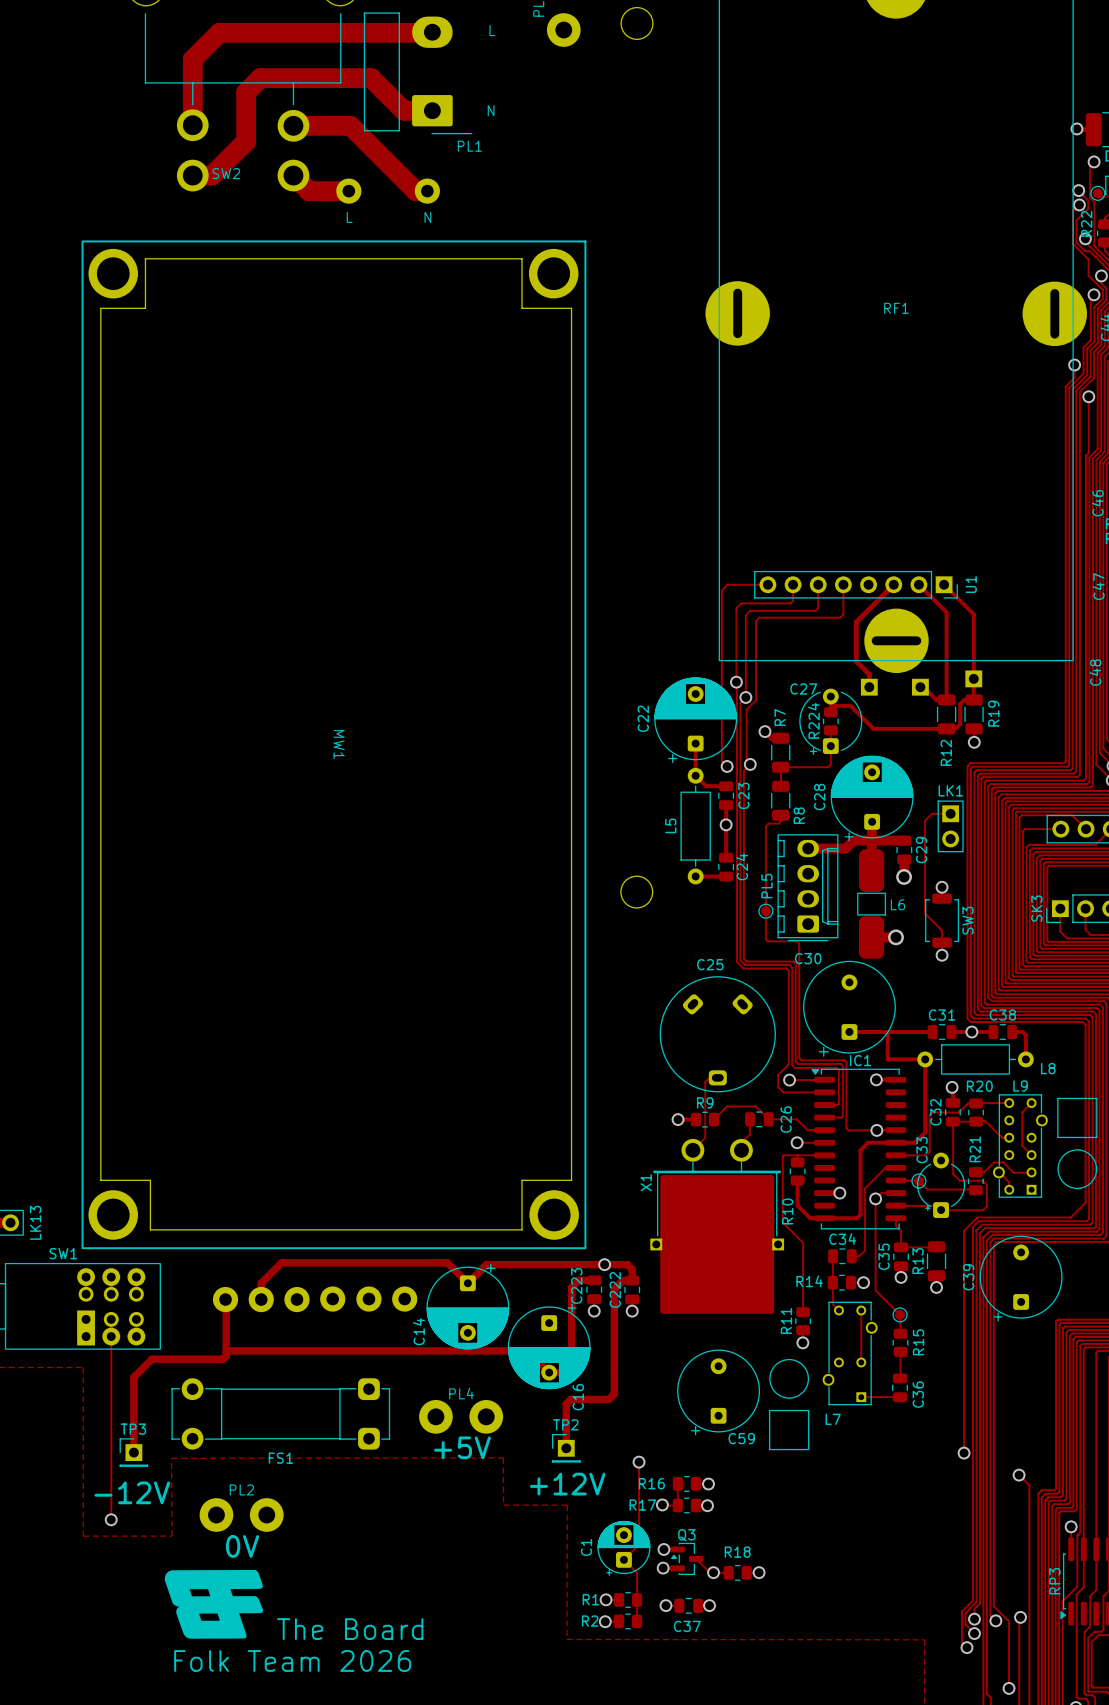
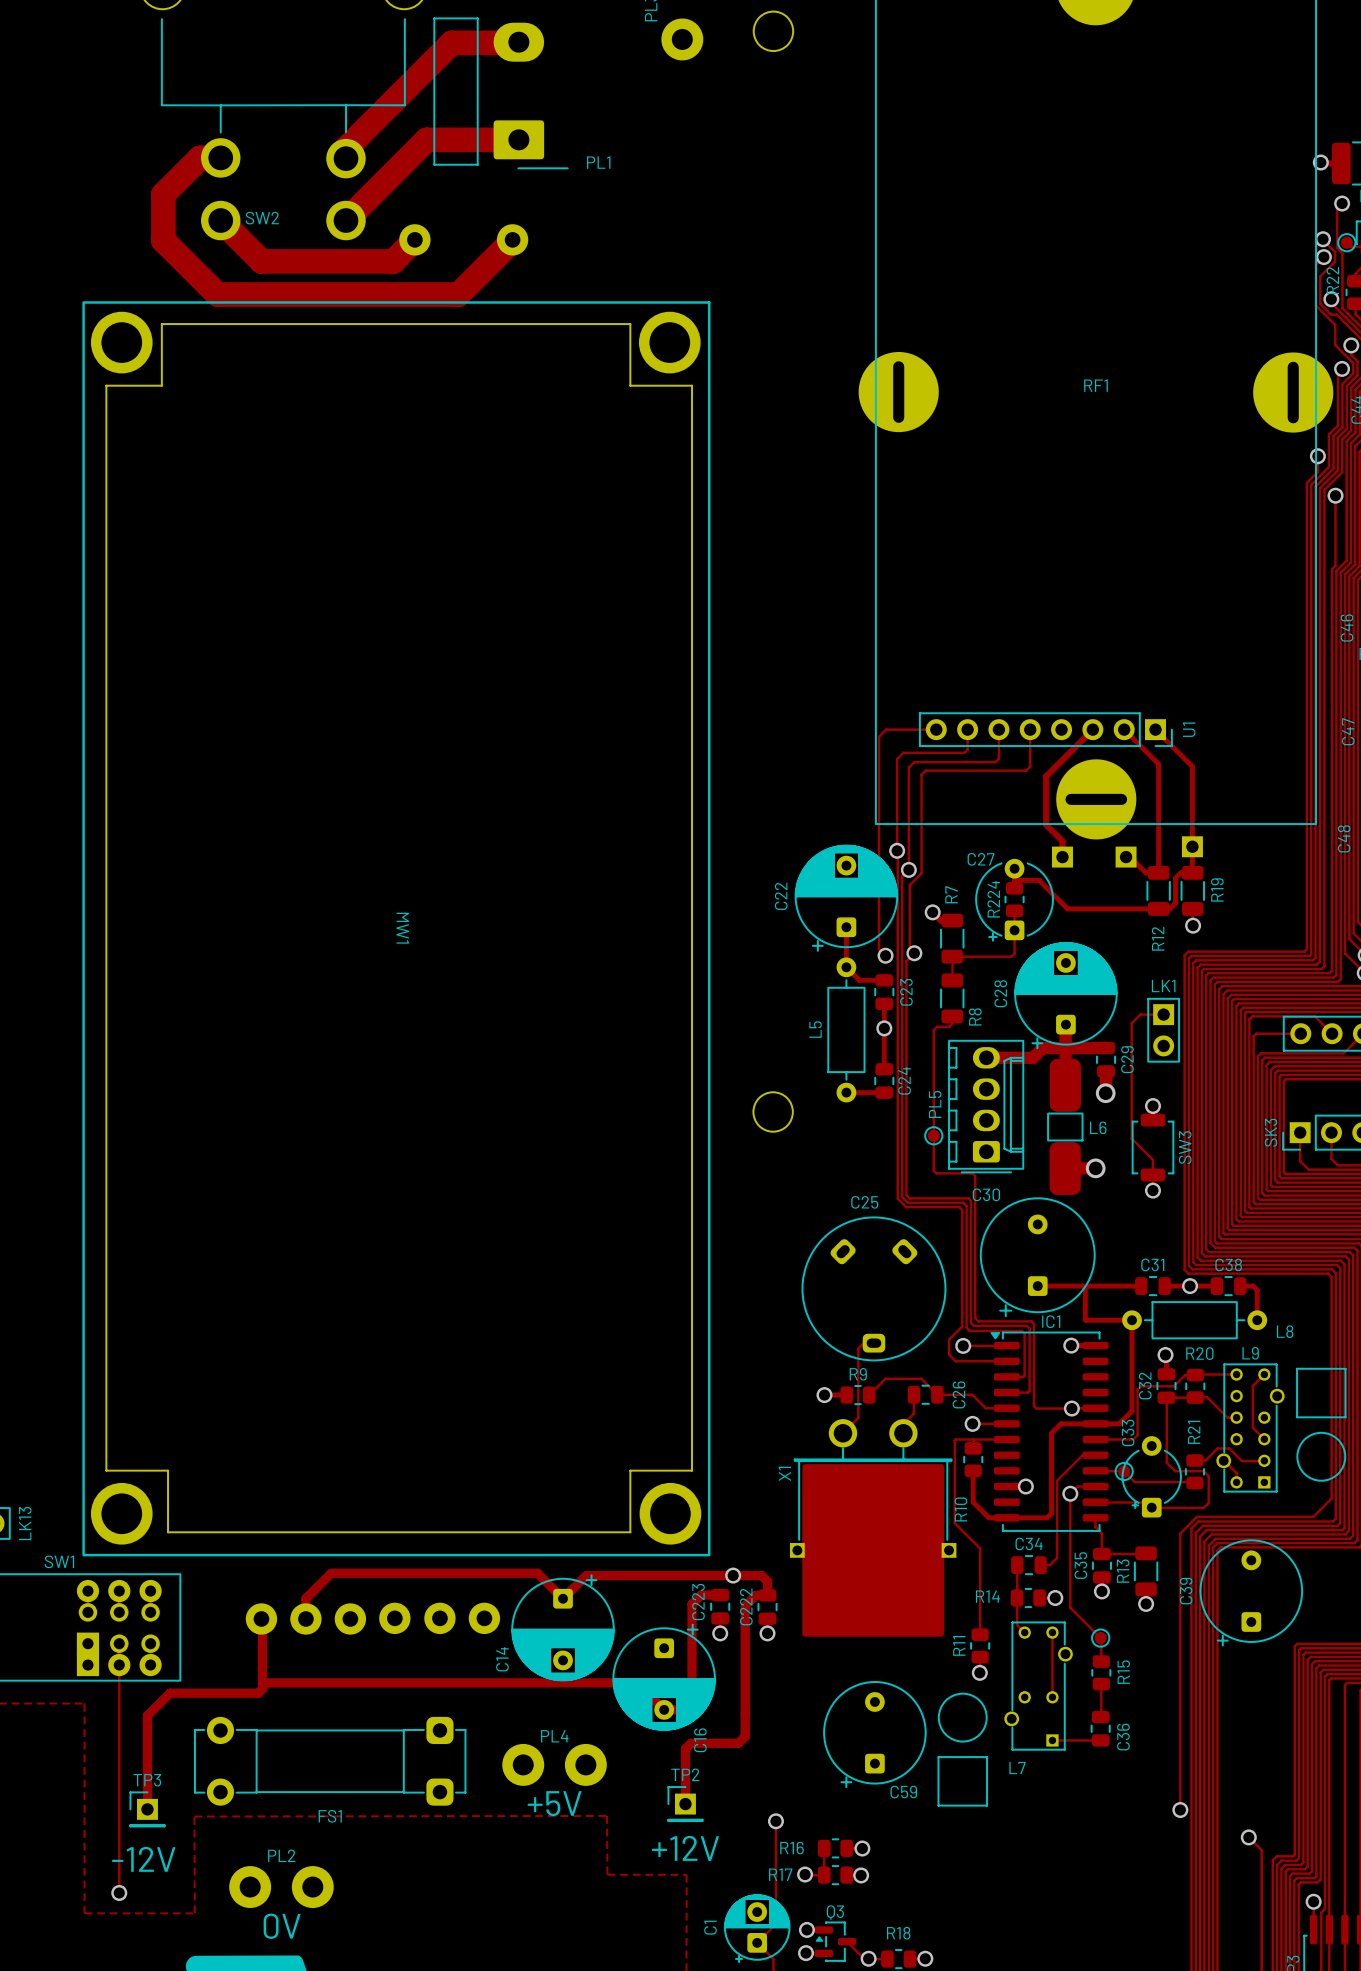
text: L (492, 30) -> none
track: (378, 32) (219, 32) (192, 59) (192, 125) -> (451, 42) (346, 148) (346, 158)
track: (403, 110) (371, 78) (260, 78) (246, 92) (246, 141) (211, 175) (192, 175) -> (414, 239) (393, 261) (261, 261) (220, 220)
text: N (491, 110) -> none
track: none -> (220, 157) (199, 157) (163, 194) (163, 240) (217, 294) (458, 294) (513, 239)
track: (293, 125) (350, 125) (415, 191) (427, 191) -> none
PL1 name position: PL1 (469, 146) -> PL1 (598, 162)
track: (293, 175) (309, 191) (348, 191) -> (346, 220) (426, 139) (483, 139)
text: L (349, 217) -> none
text: N (427, 217) -> none

